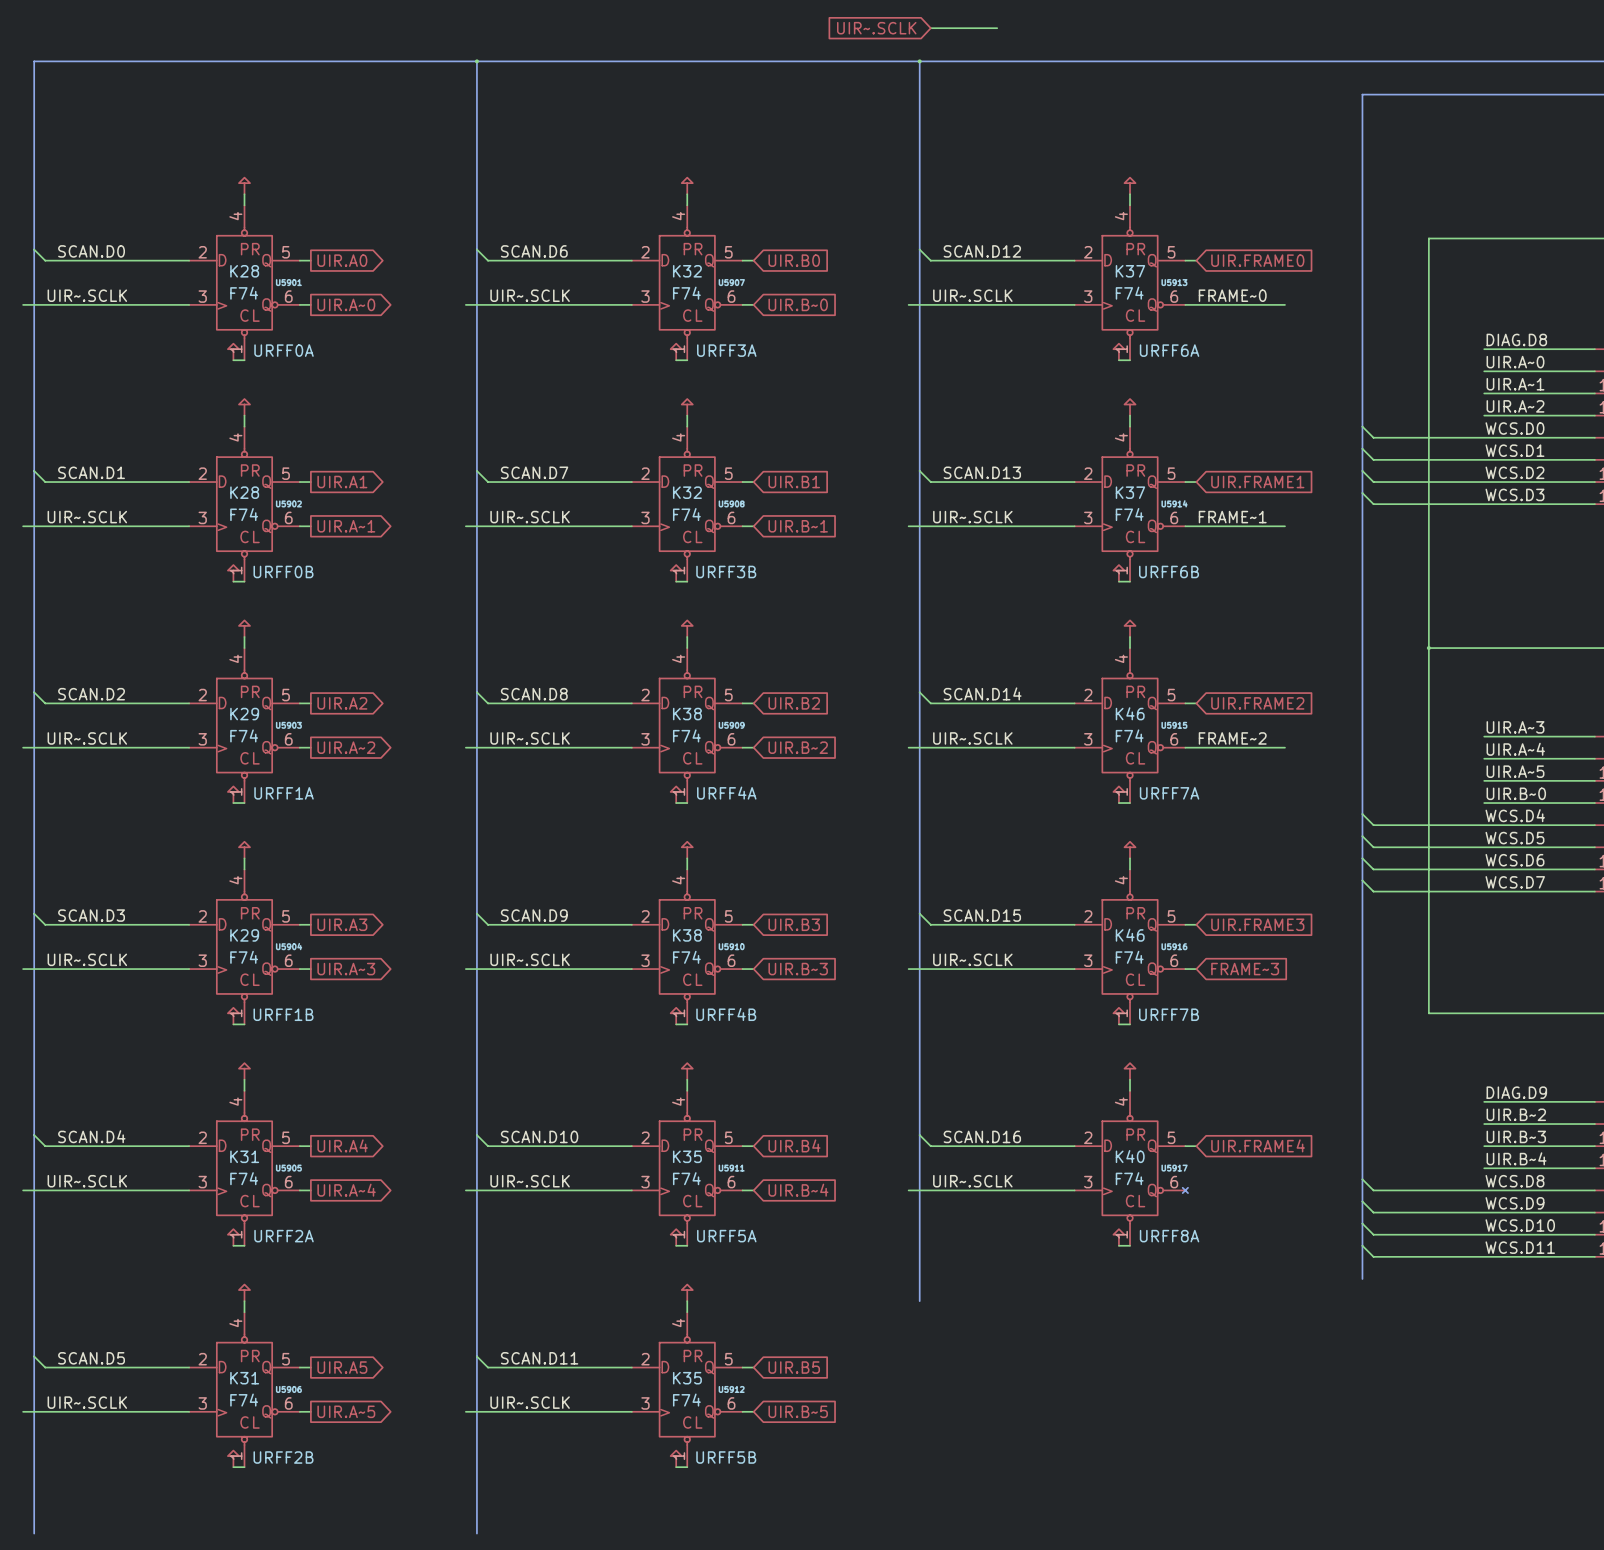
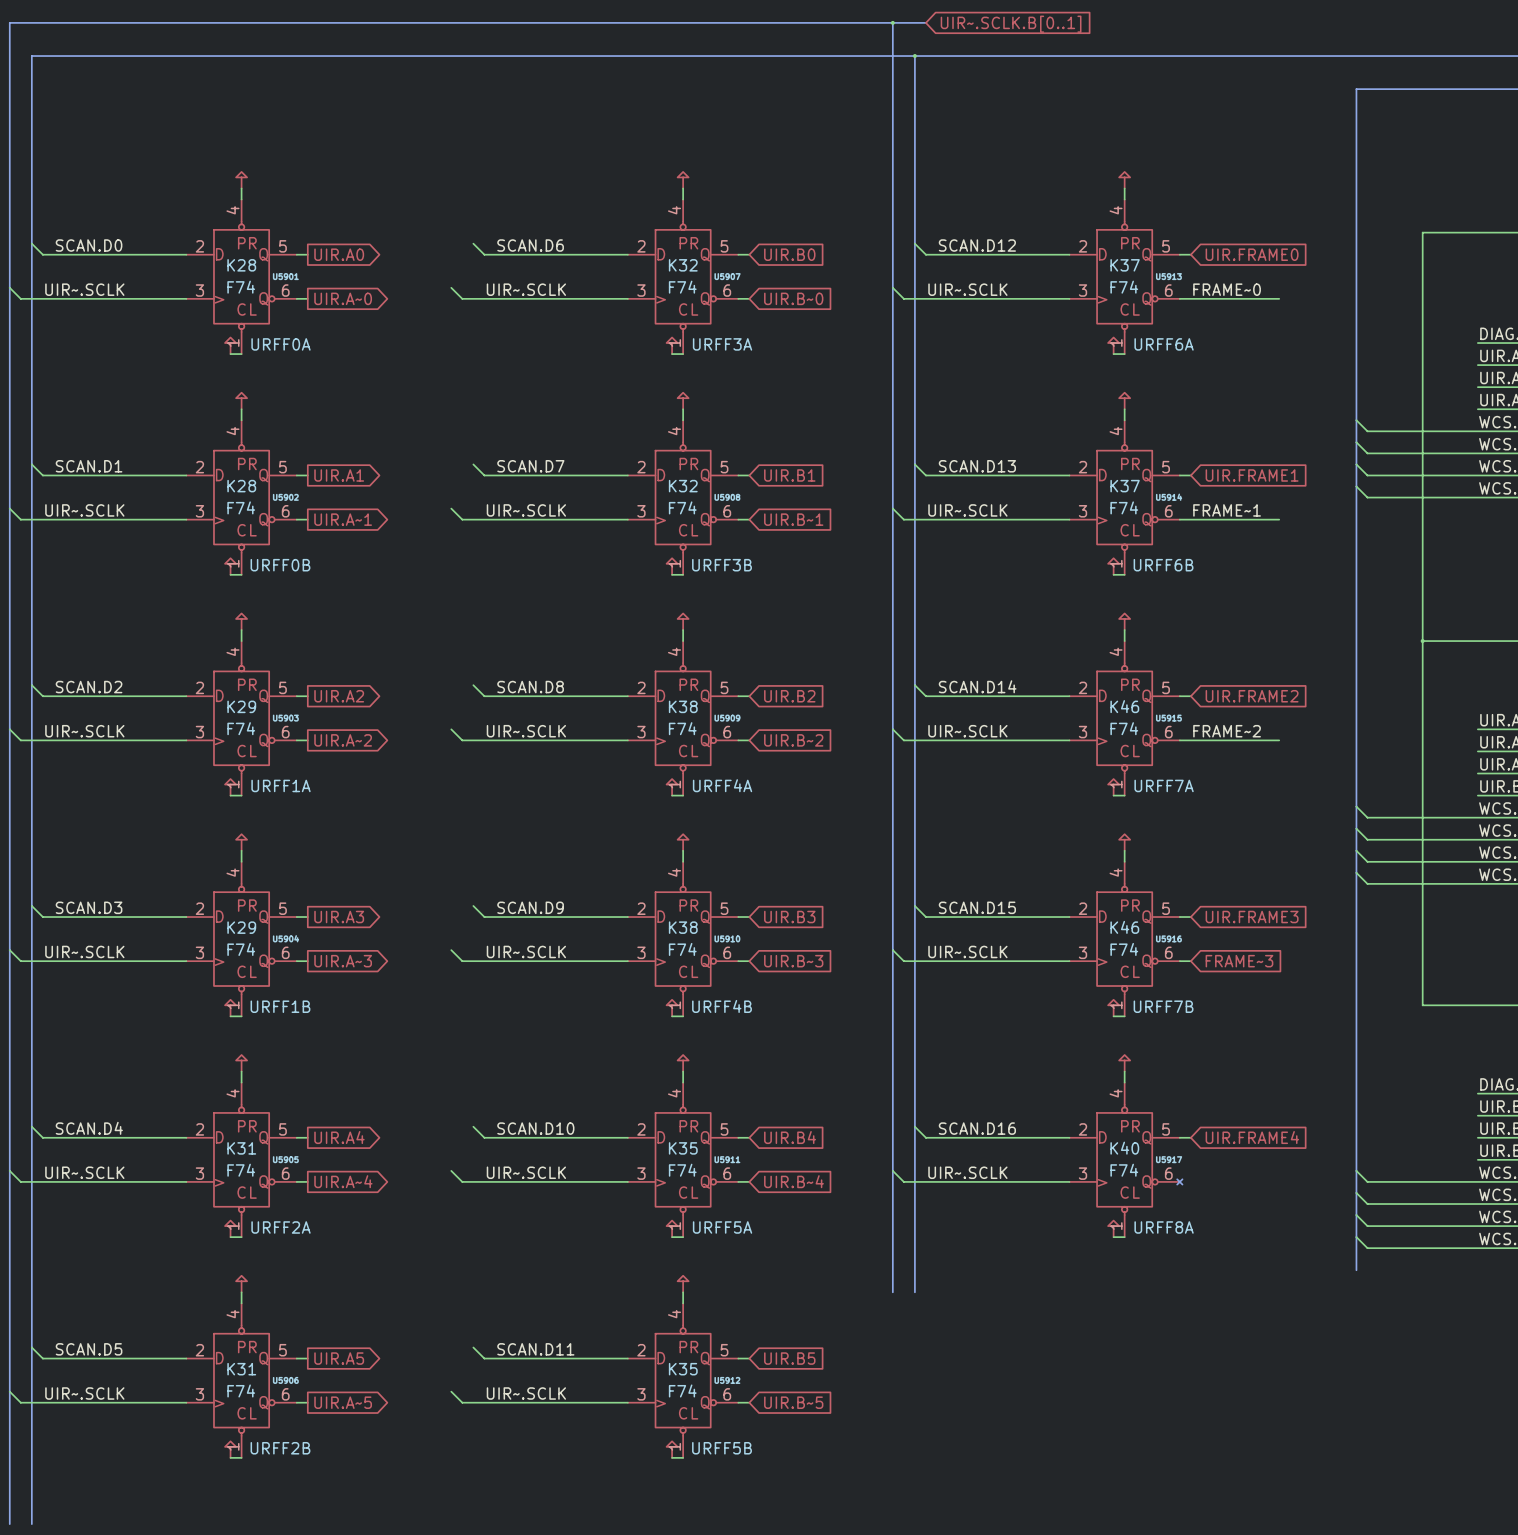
global label: UIR~.SCLK (876, 28) -> UIR~.SCLK.B[0..1] (1011, 24)
bus: none -> (892, 22) (892, 1292)
junction: none -> (892, 22)
bus: none -> (925, 22) (9, 22) (9, 1524)
wire: (930, 28) (997, 28) -> none
bus: (476, 61) (476, 1533) -> none
junction: (476, 61) -> none
wire: none -> (9, 287) (20, 298)
wire: none -> (451, 287) (462, 298)
wire: none -> (892, 287) (903, 298)
wire: none -> (9, 508) (20, 519)
wire: none -> (451, 508) (462, 519)
wire: none -> (892, 508) (903, 519)
wire: none -> (9, 729) (20, 740)
wire: none -> (451, 729) (462, 740)
wire: none -> (892, 729) (903, 740)
wire: none -> (9, 950) (20, 961)
wire: none -> (451, 950) (462, 961)
wire: none -> (892, 950) (903, 961)
wire: none -> (9, 1170) (20, 1181)
wire: none -> (451, 1170) (462, 1181)
wire: none -> (892, 1170) (903, 1181)
wire: none -> (9, 1391) (20, 1402)
wire: none -> (451, 1391) (462, 1402)

